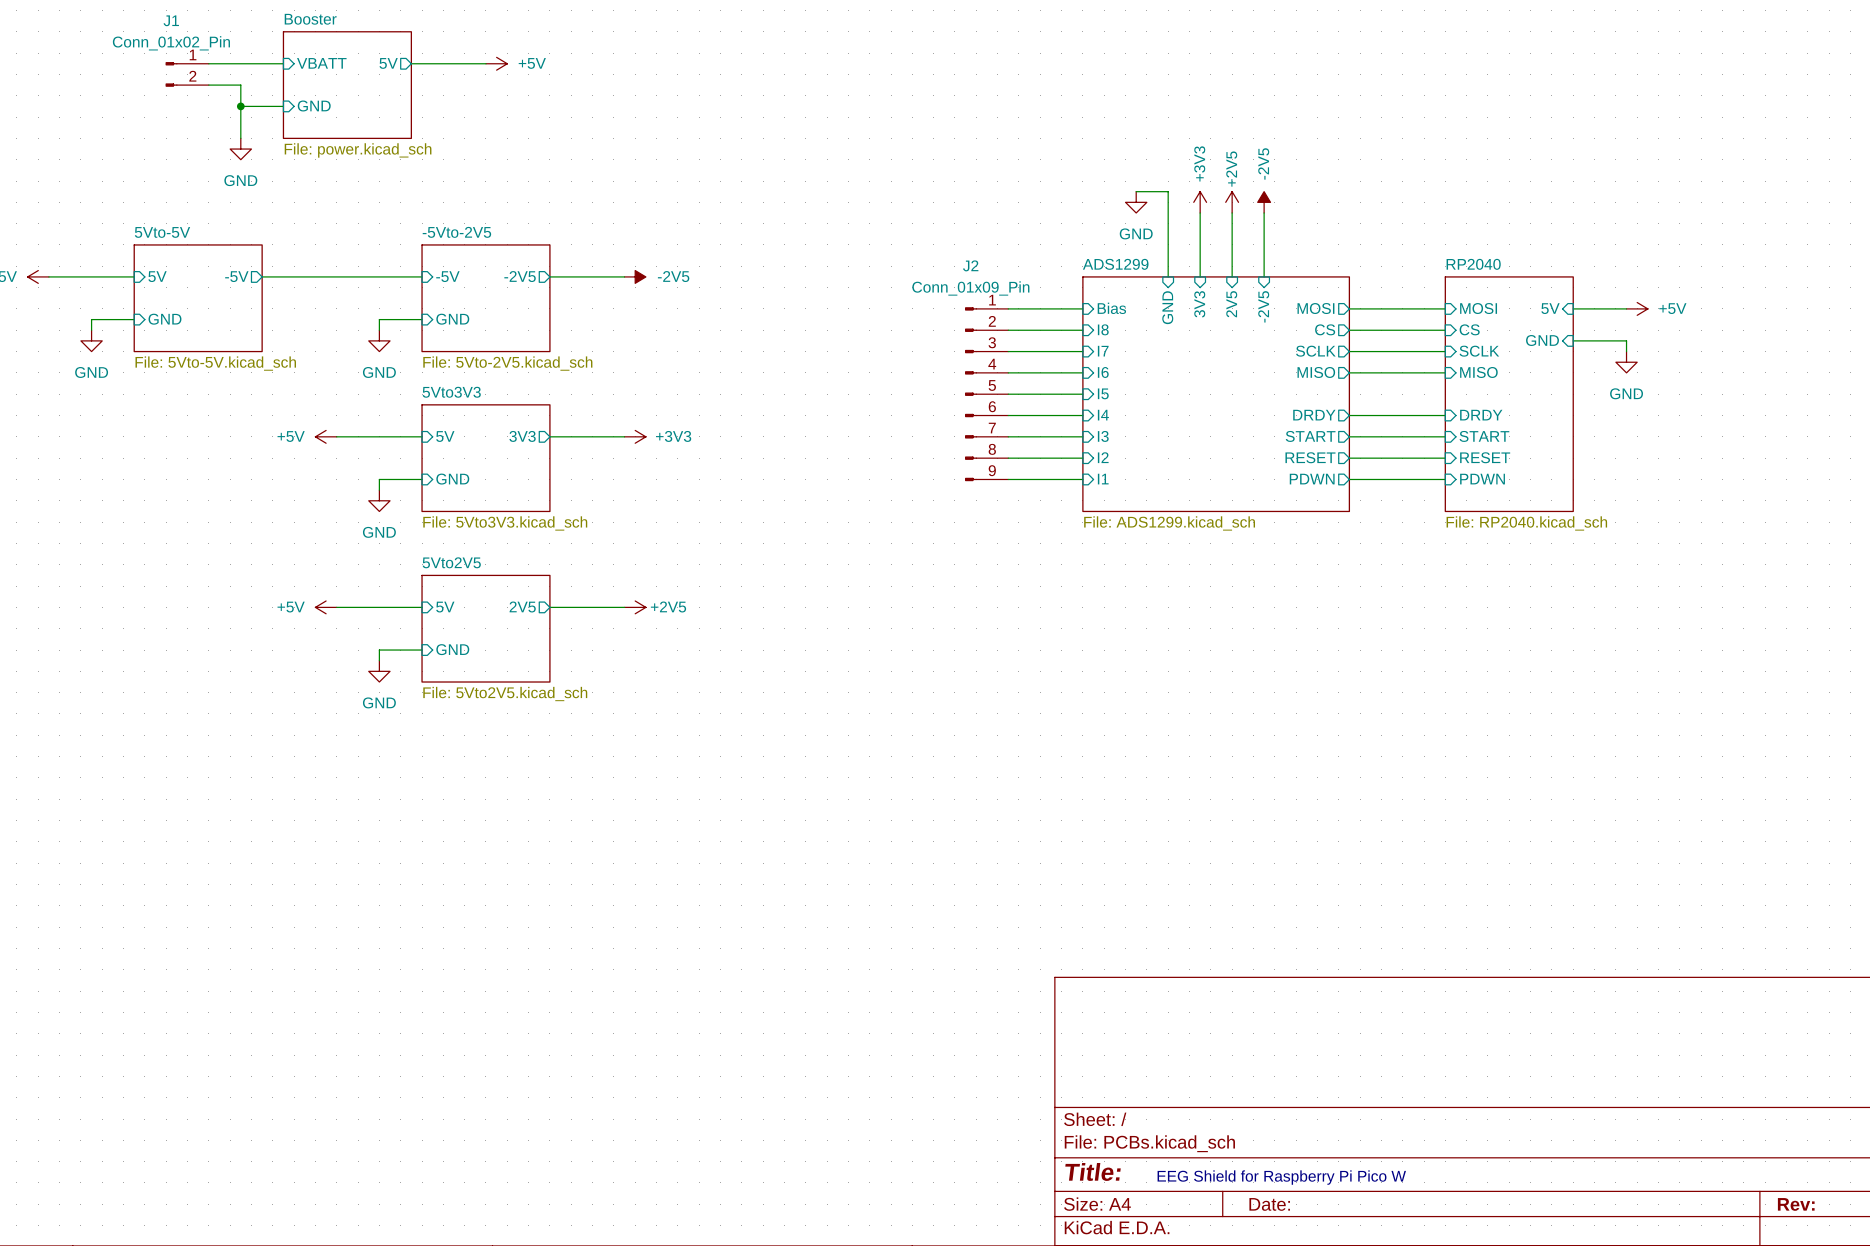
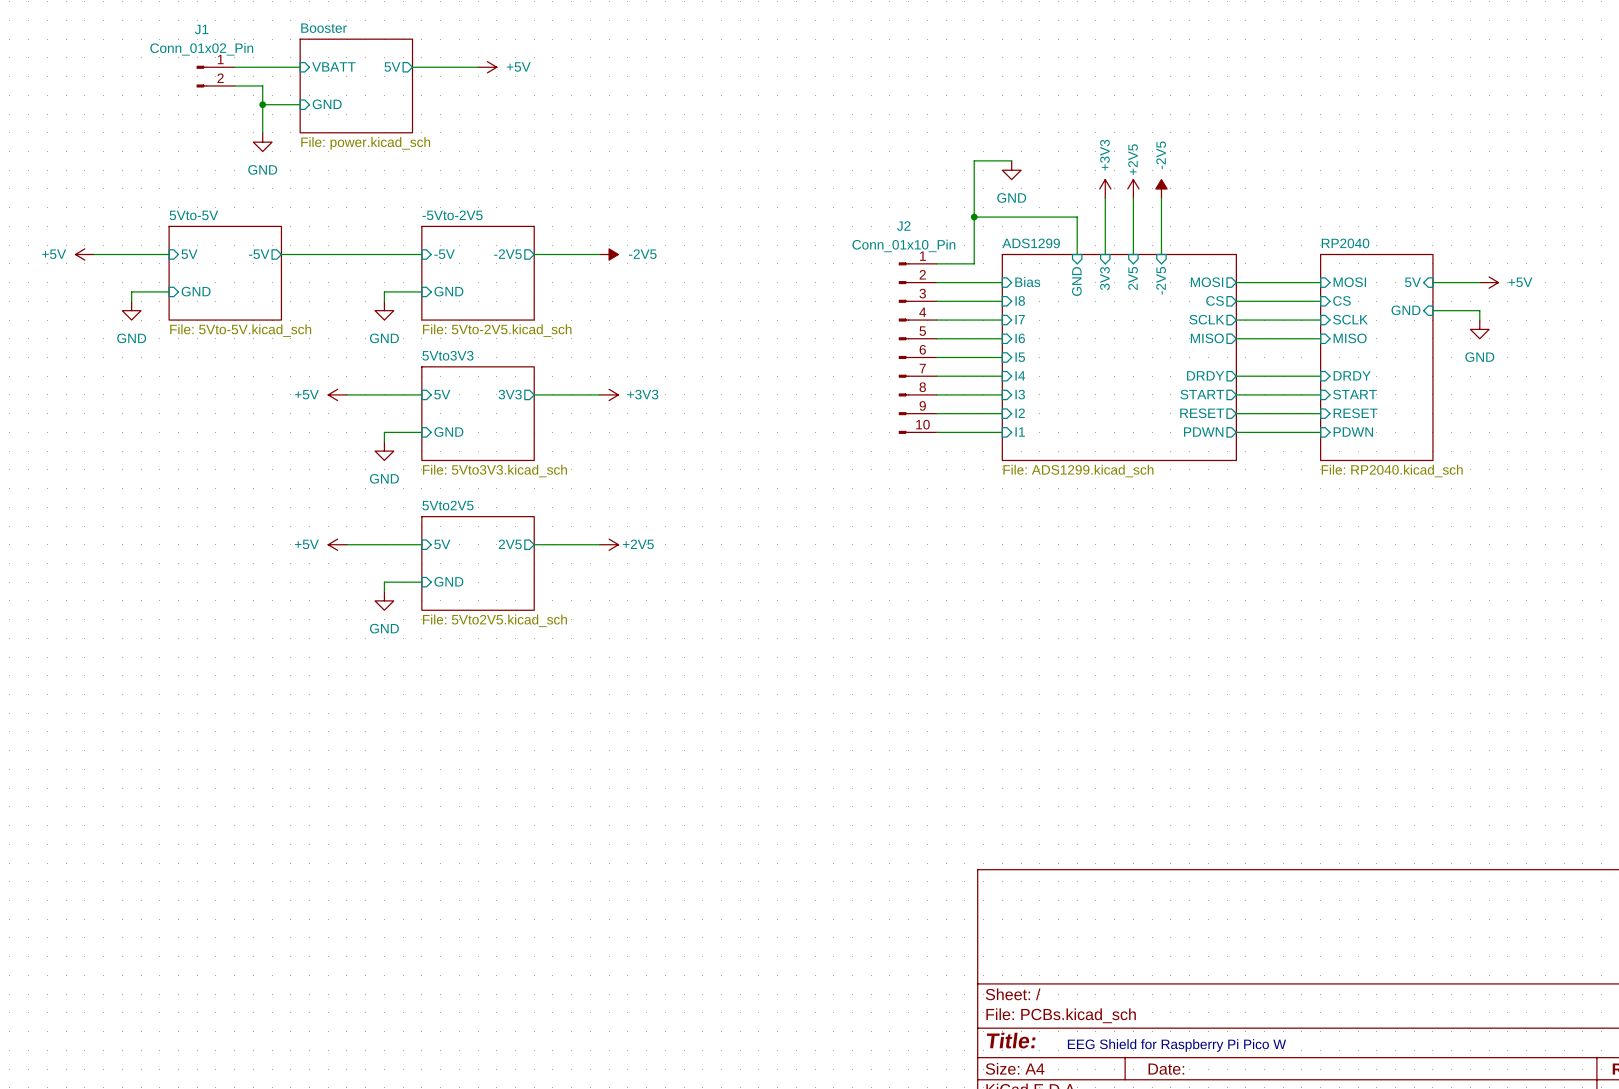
wire: none -> (1011, 160) (974, 160) (974, 263) (936, 263)
wire: (1136, 191) (1168, 191) (1168, 234) -> (974, 217) (1077, 217)
power symbol position: GND (1136, 202) -> GND (1011, 170)
junction: none -> (974, 217)
J2 value: Conn_01x09_Pin (970, 288) -> Conn_01x10_Pin (903, 245)
J2 symbol: [965, 307, 1009, 482] -> [898, 262, 937, 434]

